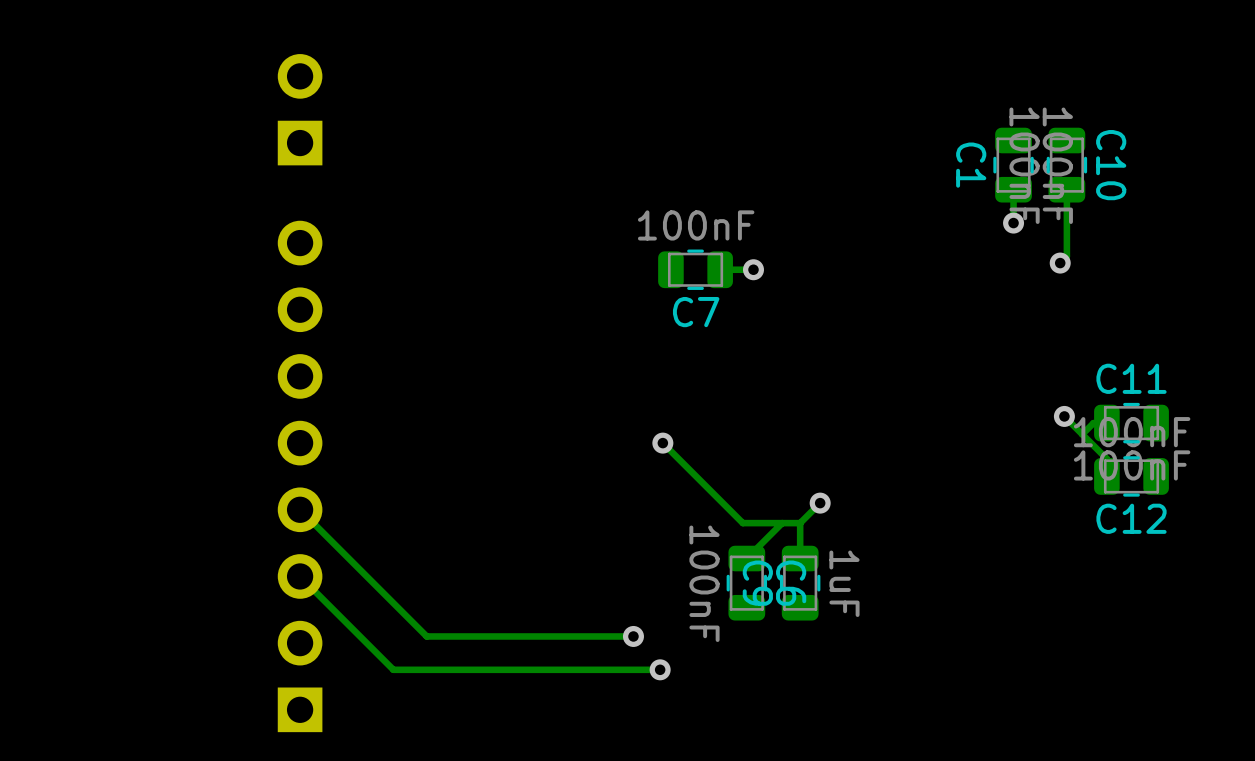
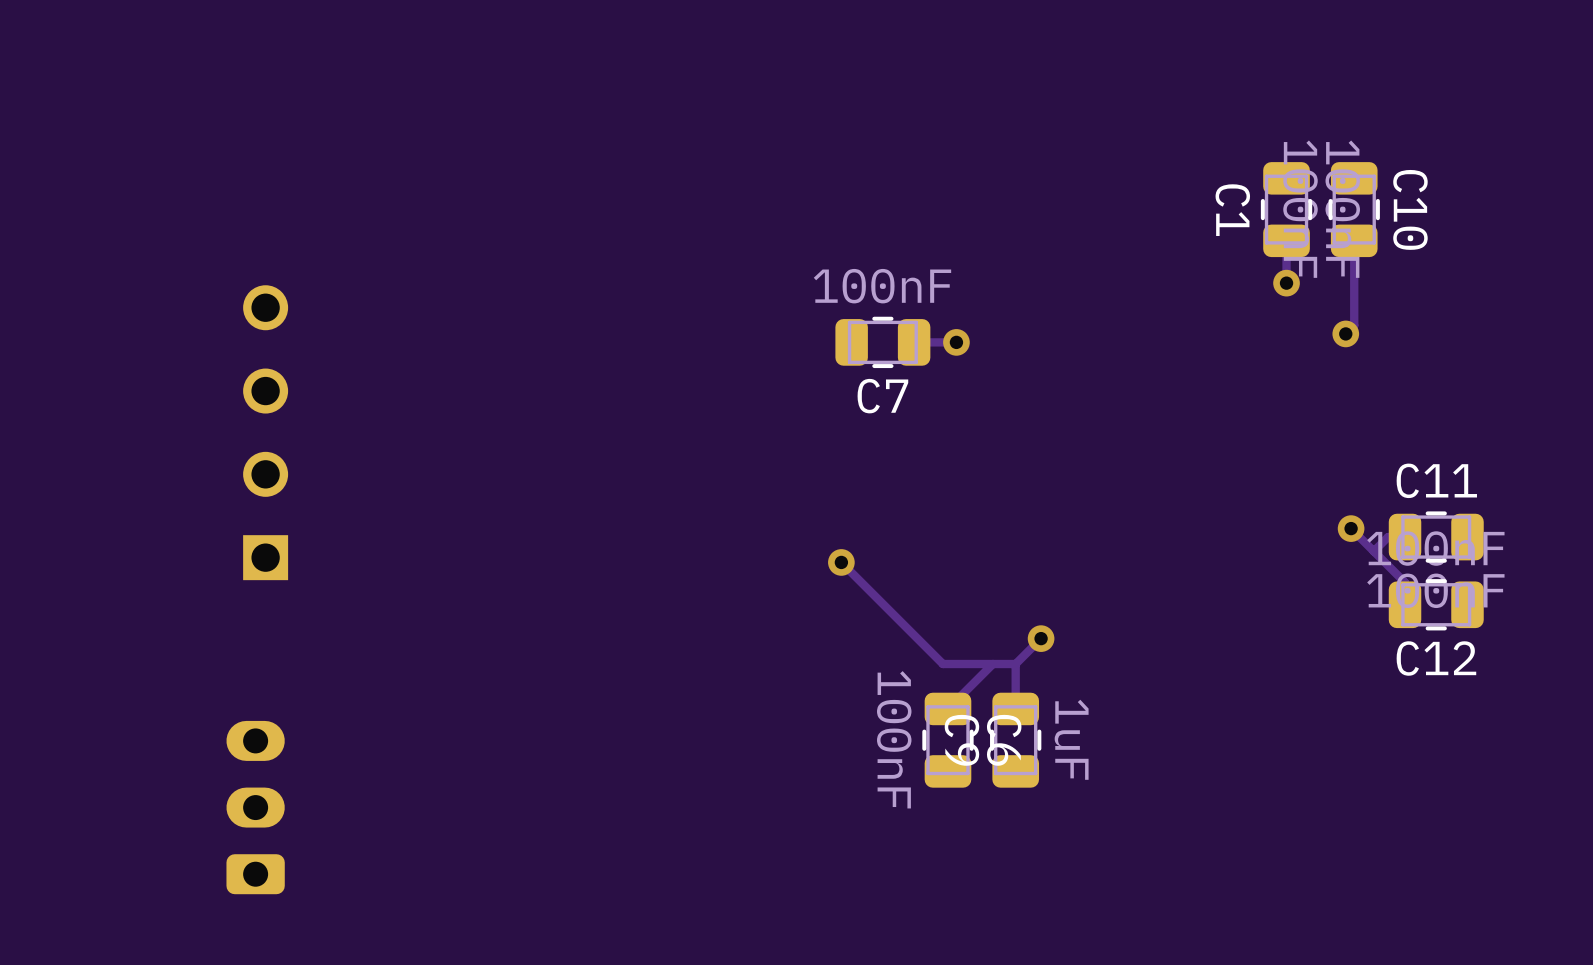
part: (300, 109) -> none
part: none -> (265, 432)
part: (300, 476) -> none
track: (300, 509) (426, 636) (633, 636) -> none
track: (300, 576) (393, 669) (660, 669) -> none
part: none -> (255, 807)
via: (633, 636) -> none
via: (660, 669) -> none

